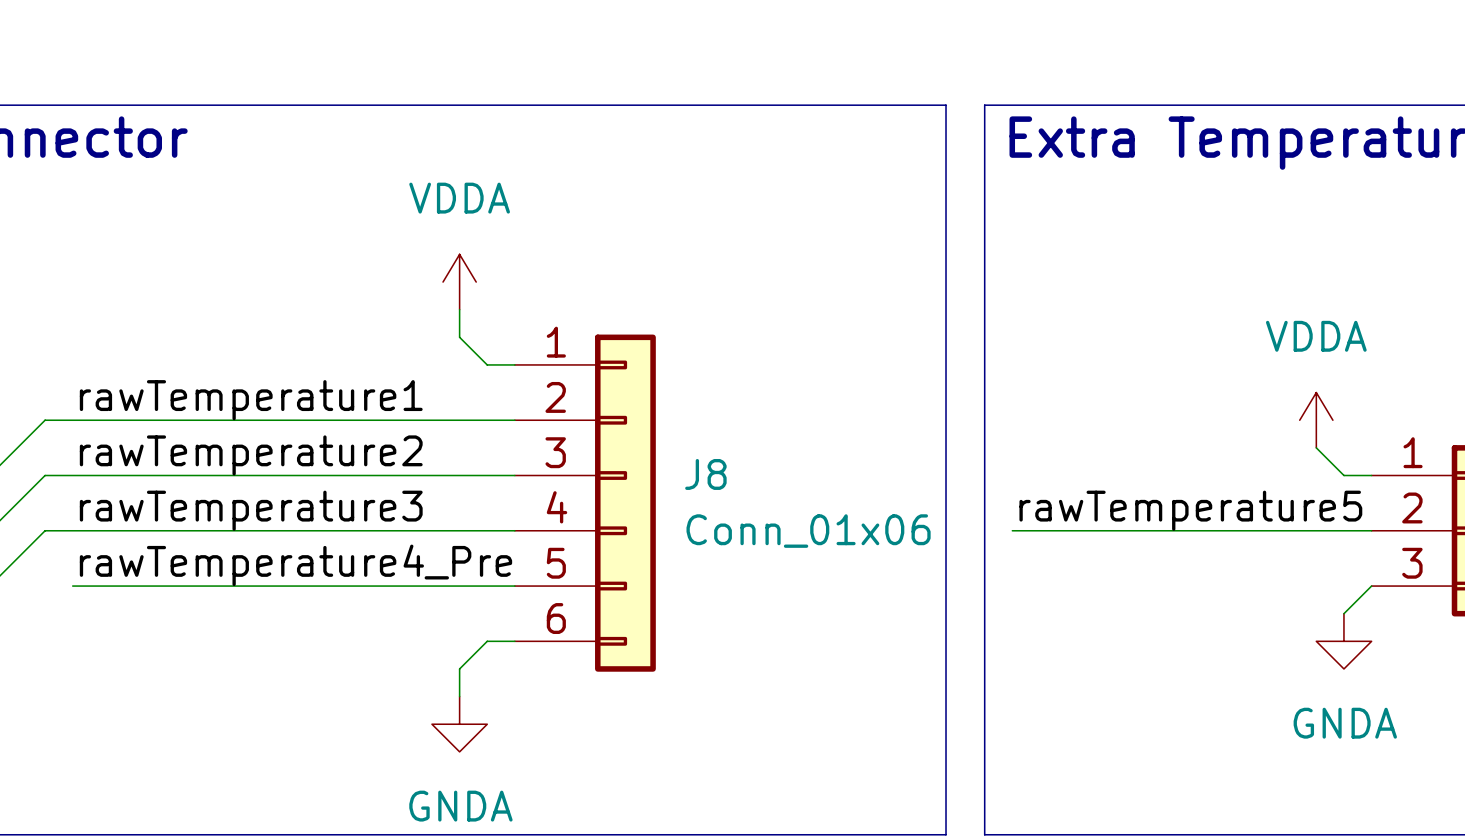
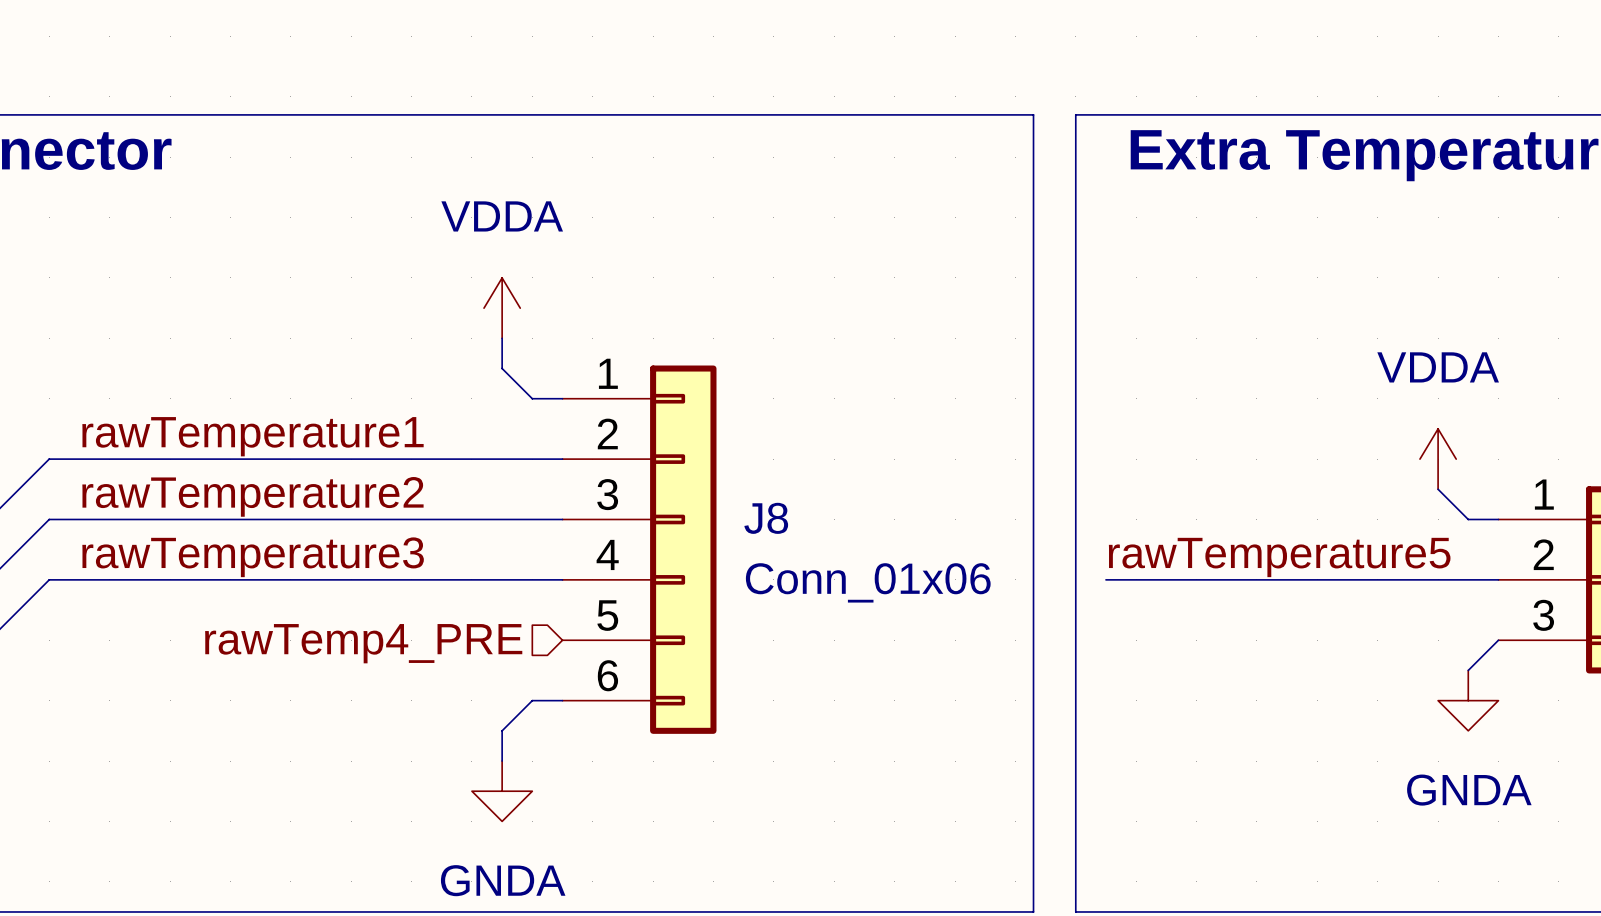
label: rawTemperature4_Pre (295, 565) -> none
wire: (72, 586) (514, 586) -> none
hierarchical label: none -> rawTemp4_PRE (363, 643)

